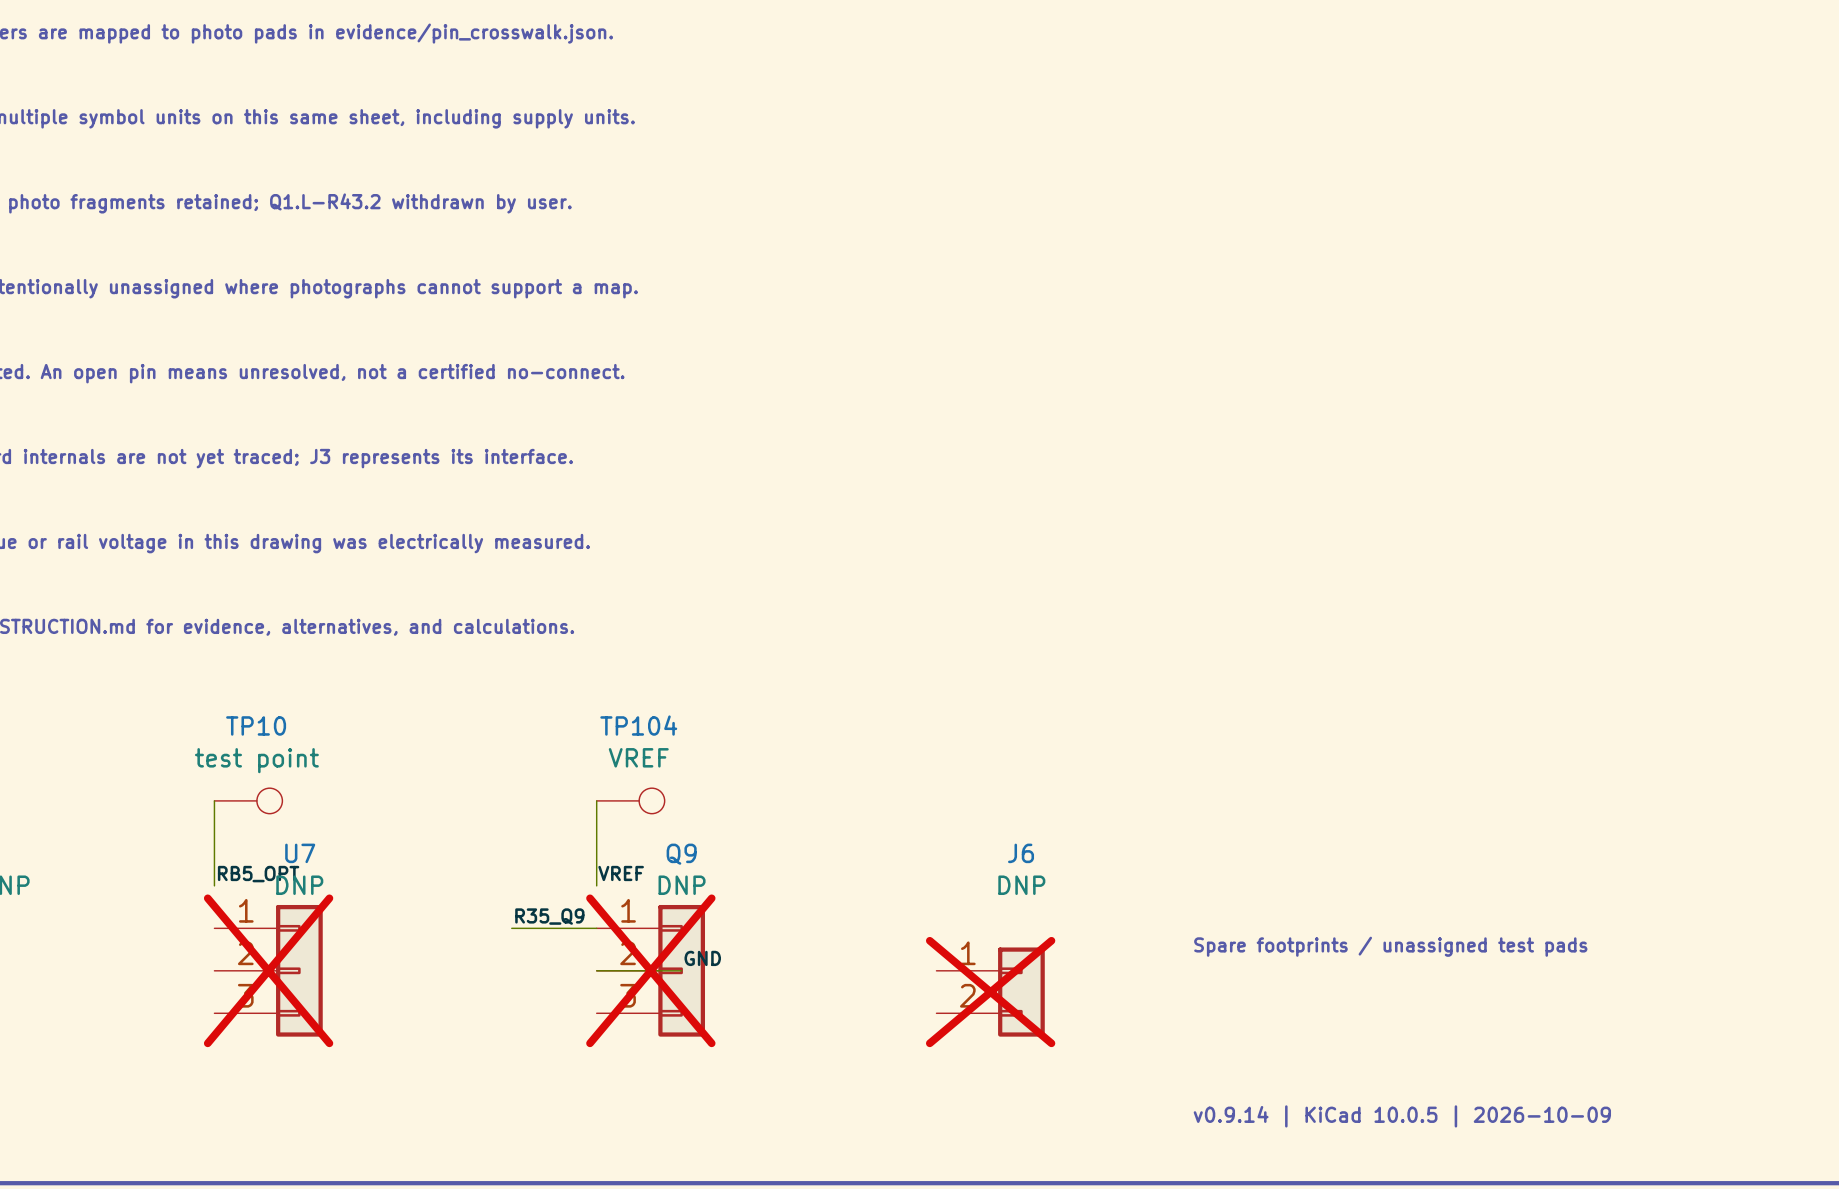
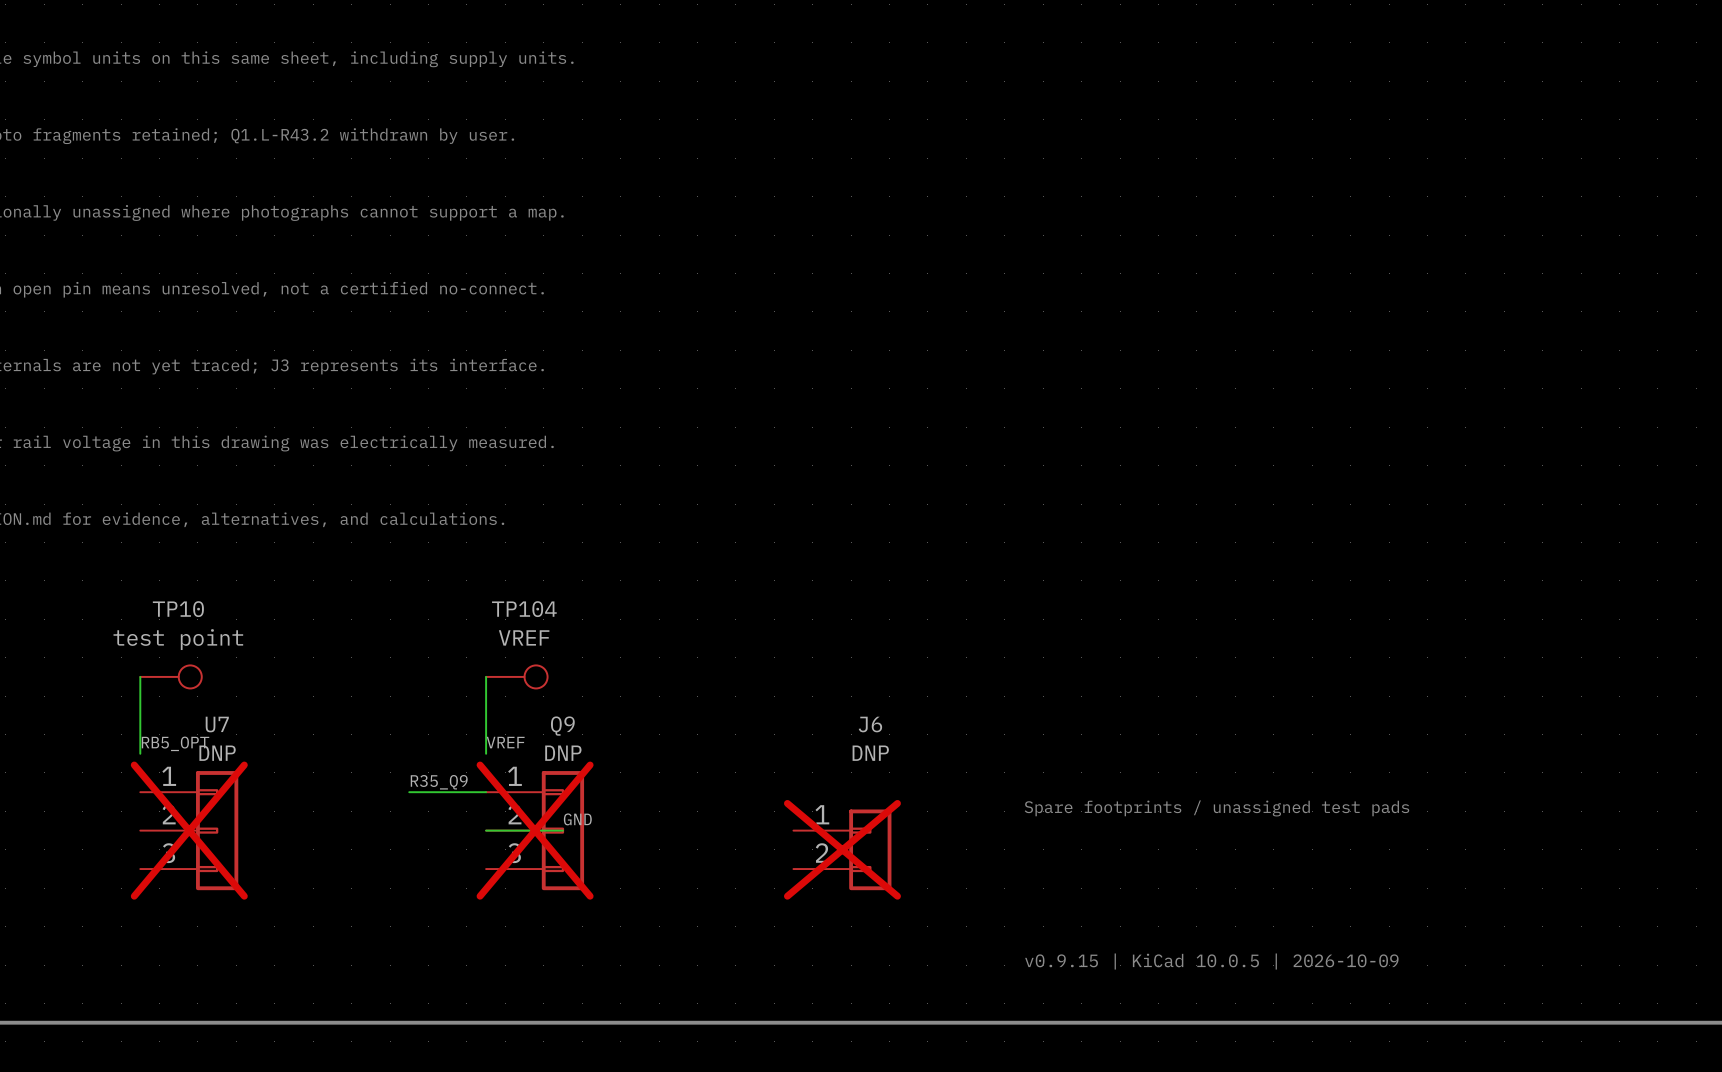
text: v0.9.14 | KiCad 10.0.5 | 2026-10-09 (1402, 1116) -> v0.9.15 | KiCad 10.0.5 | 2026-10-09 (1211, 961)

